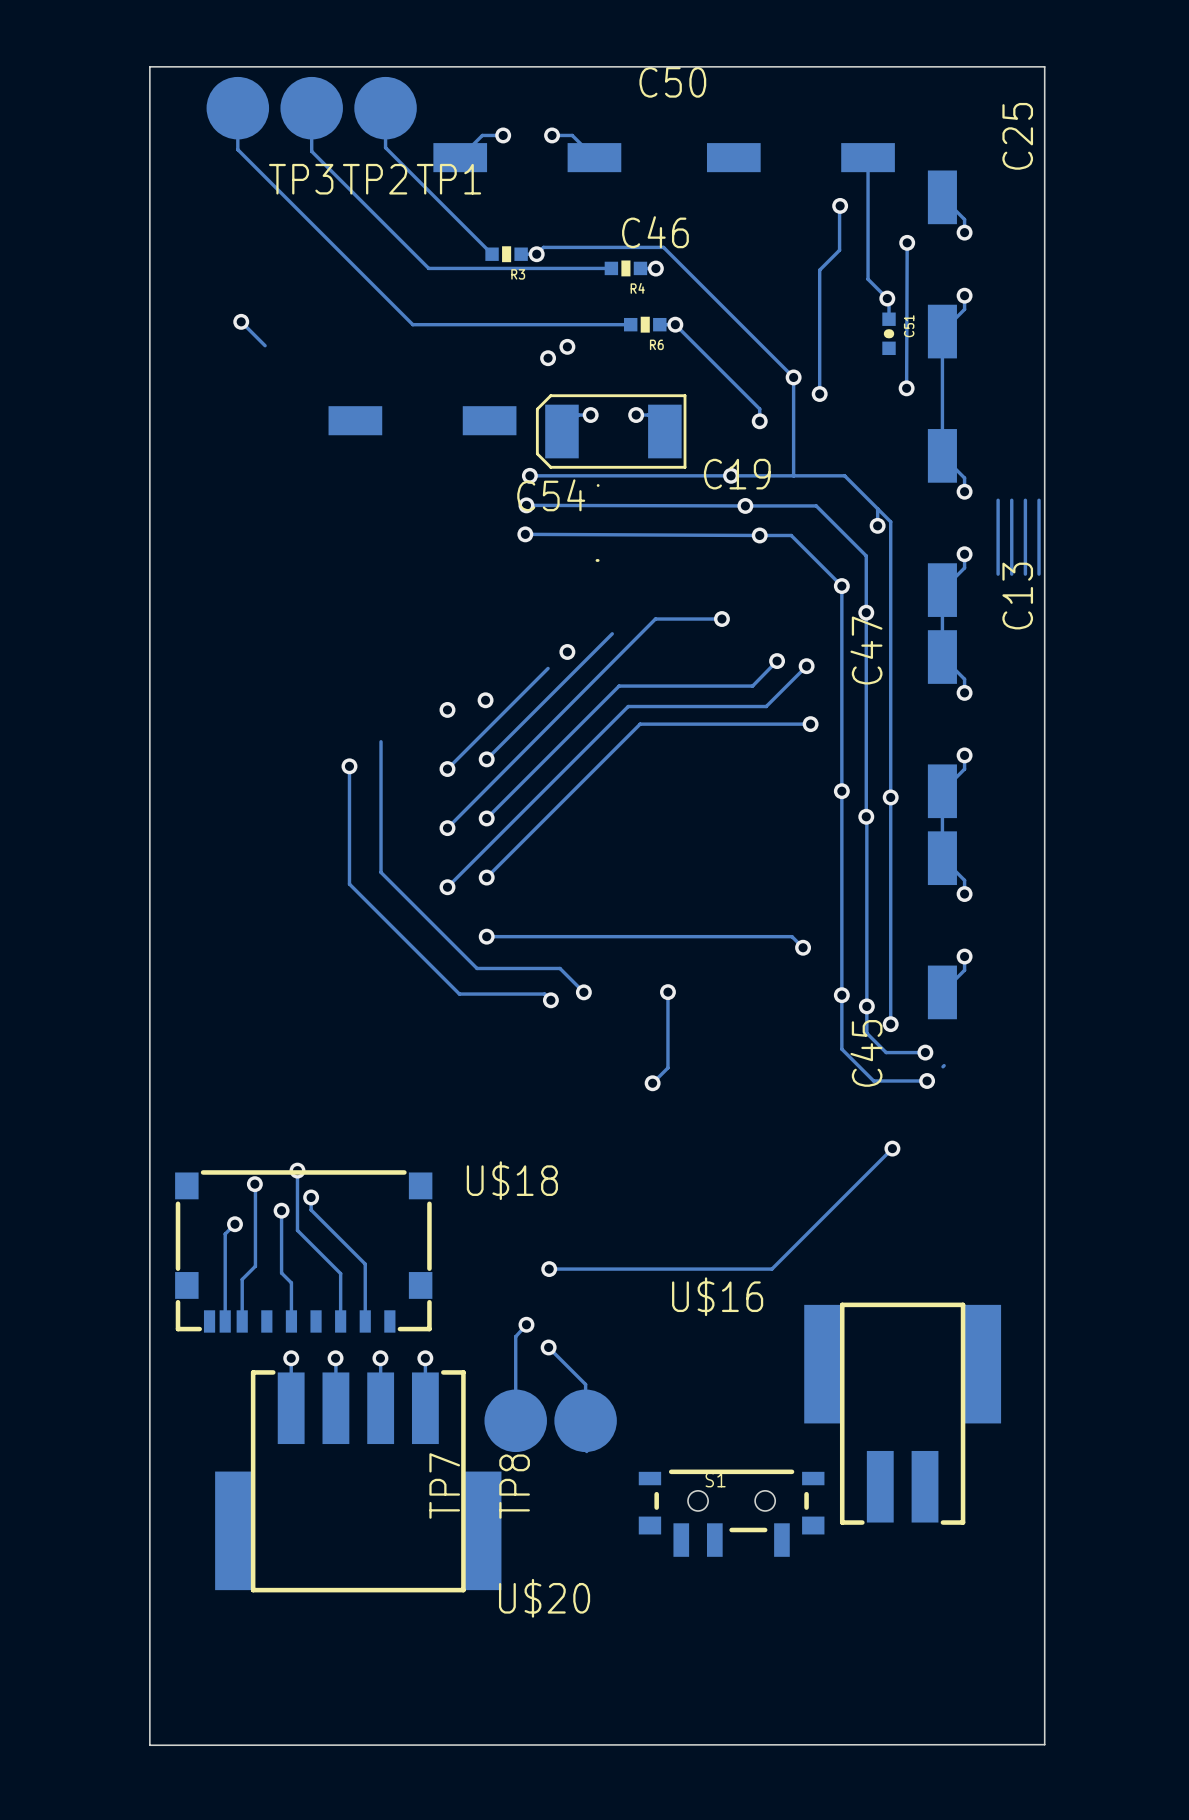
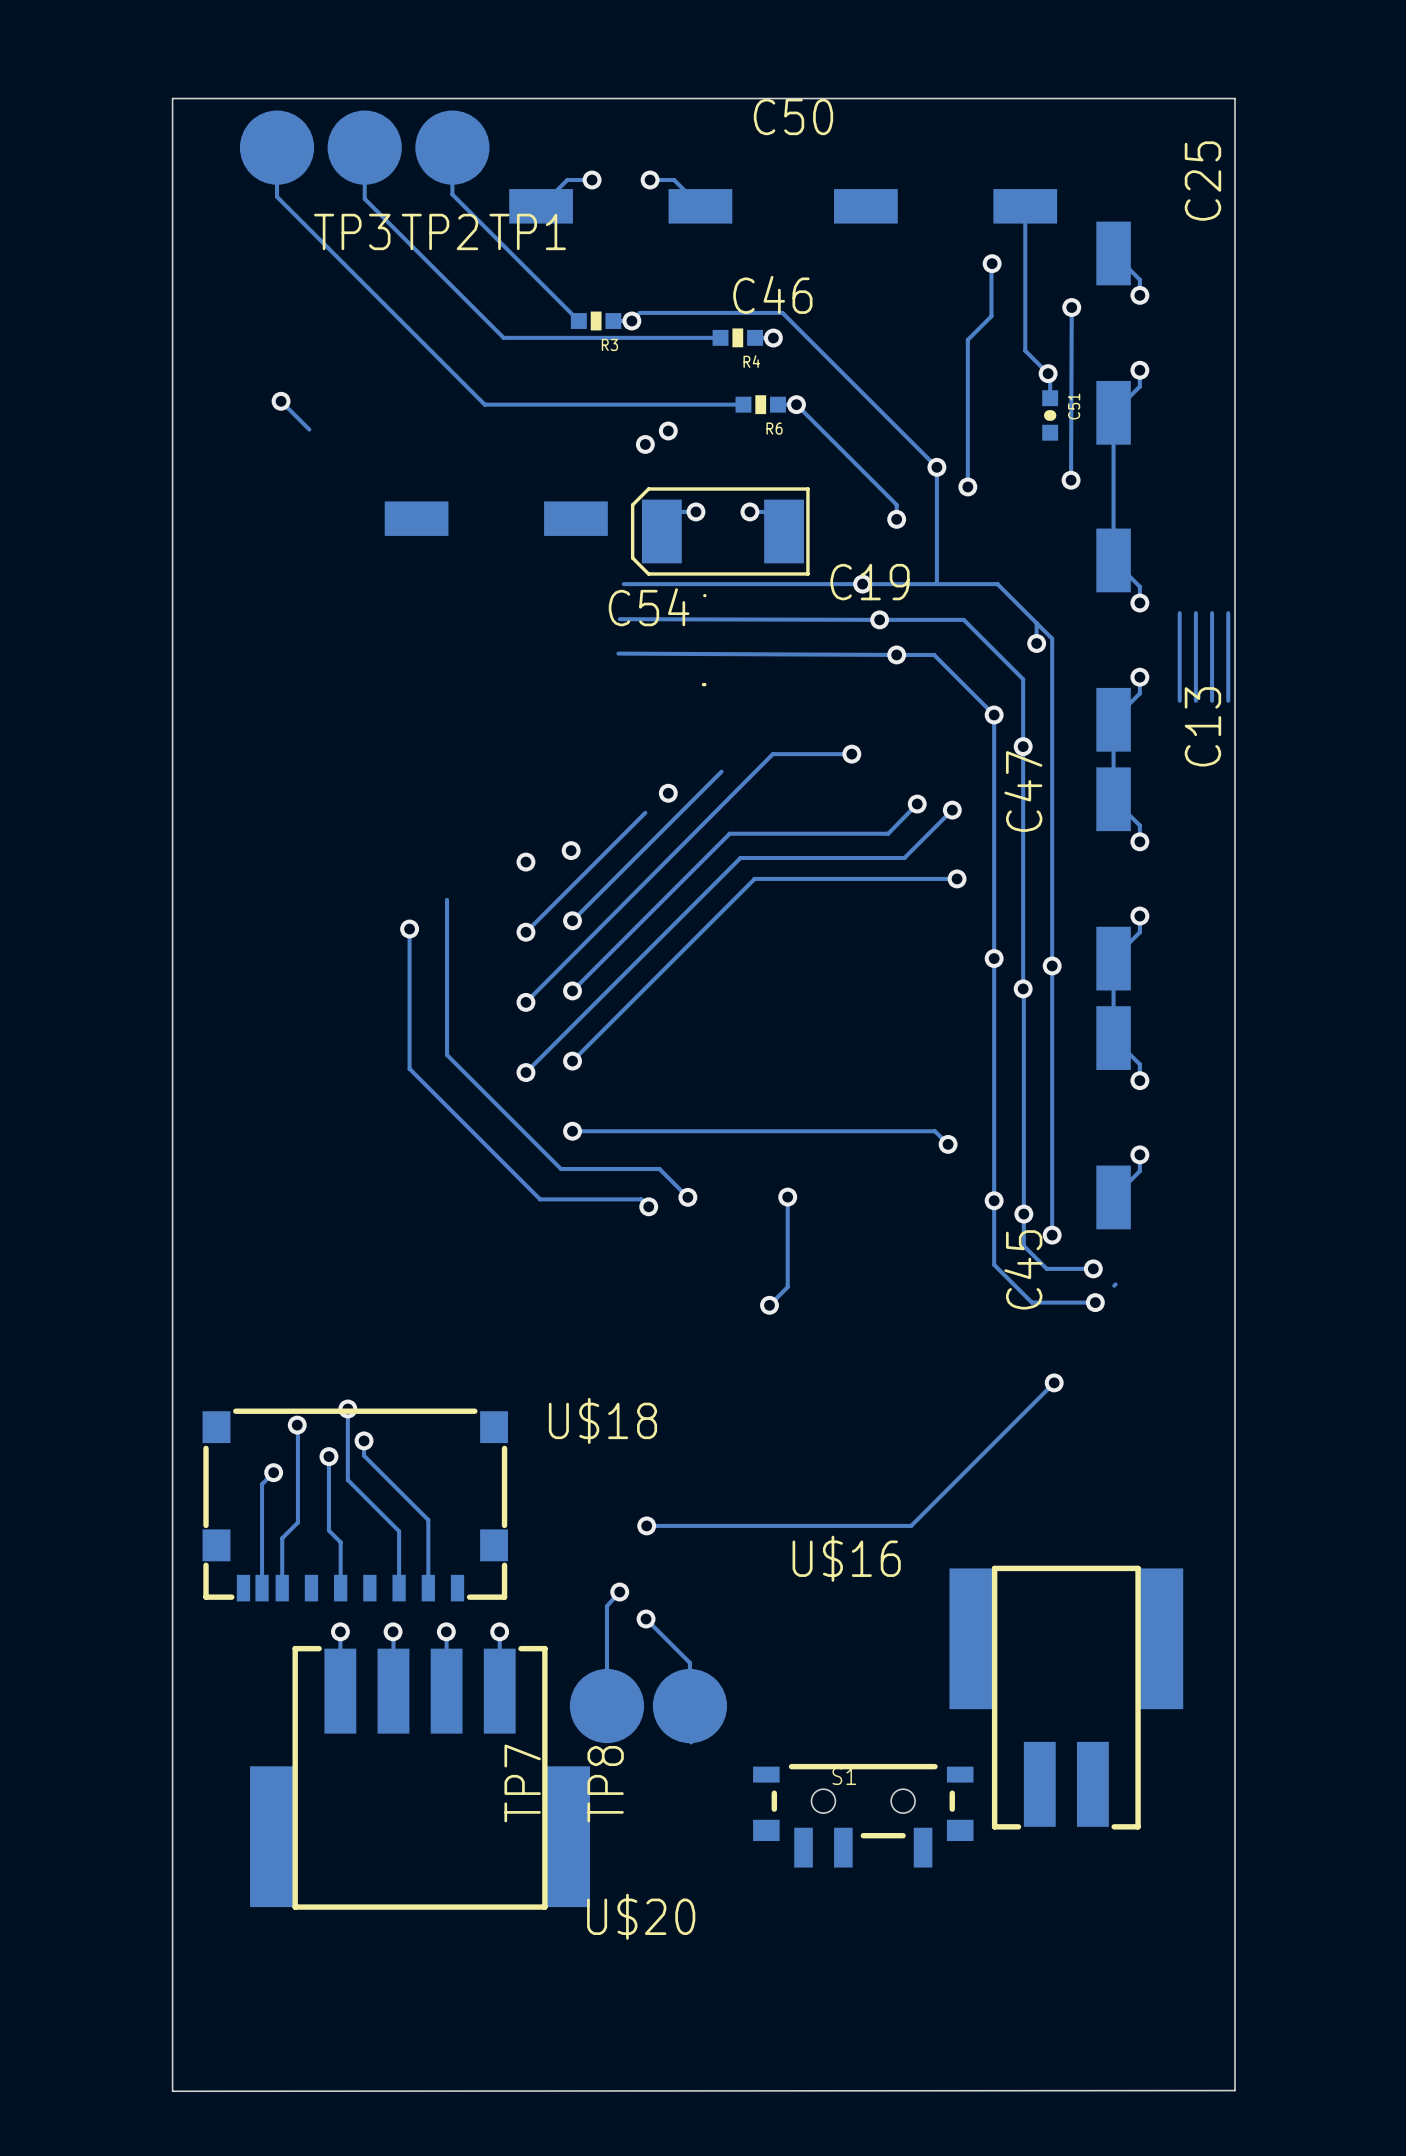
via: (529, 475) -> none
via: (526, 505) -> none
via: (525, 534) -> none

